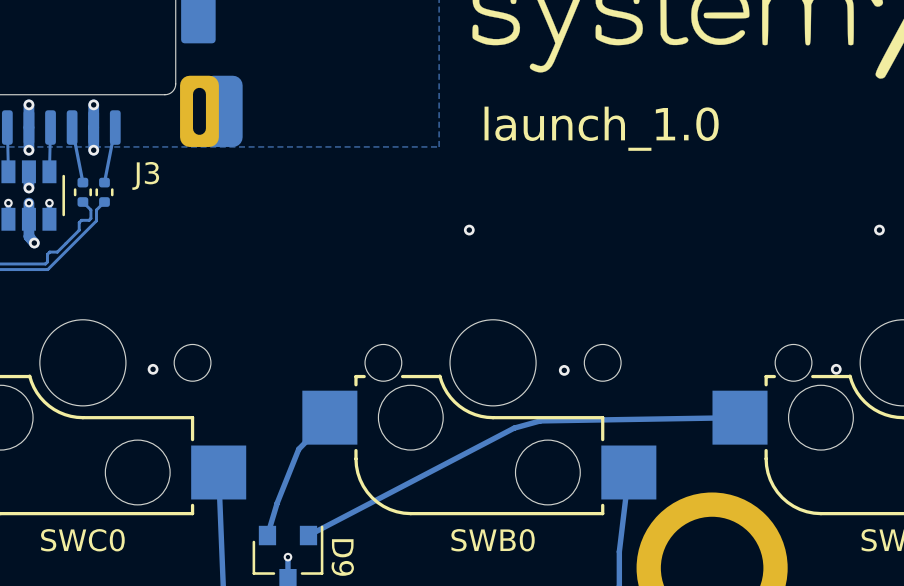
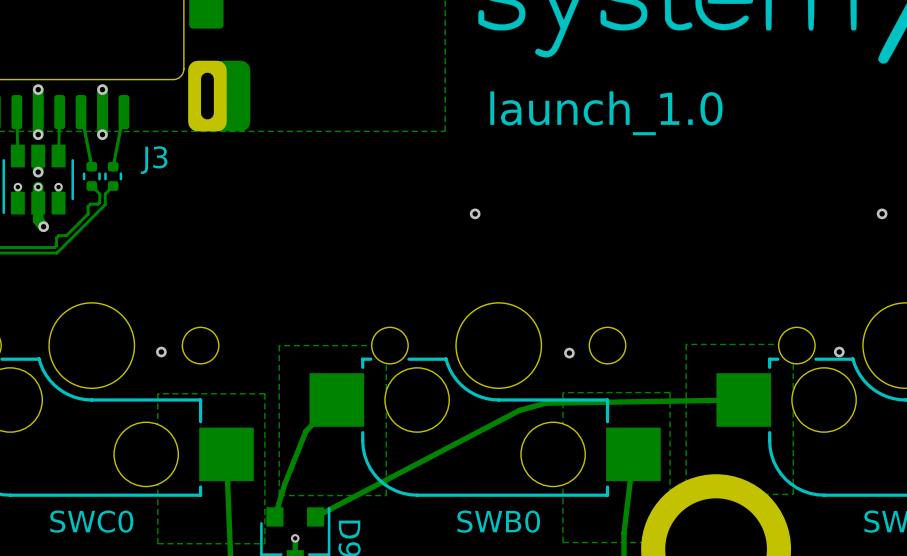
zone outline: none -> (793, 344) (793, 494) (686, 494) (686, 344) (793, 344)
zone outline: none -> (386, 345) (279, 345) (279, 495) (386, 495) (386, 345)
zone outline: none -> (670, 392) (670, 542) (562, 542) (562, 392) (670, 392)
zone outline: none -> (264, 393) (264, 543) (157, 543) (157, 393) (264, 393)

